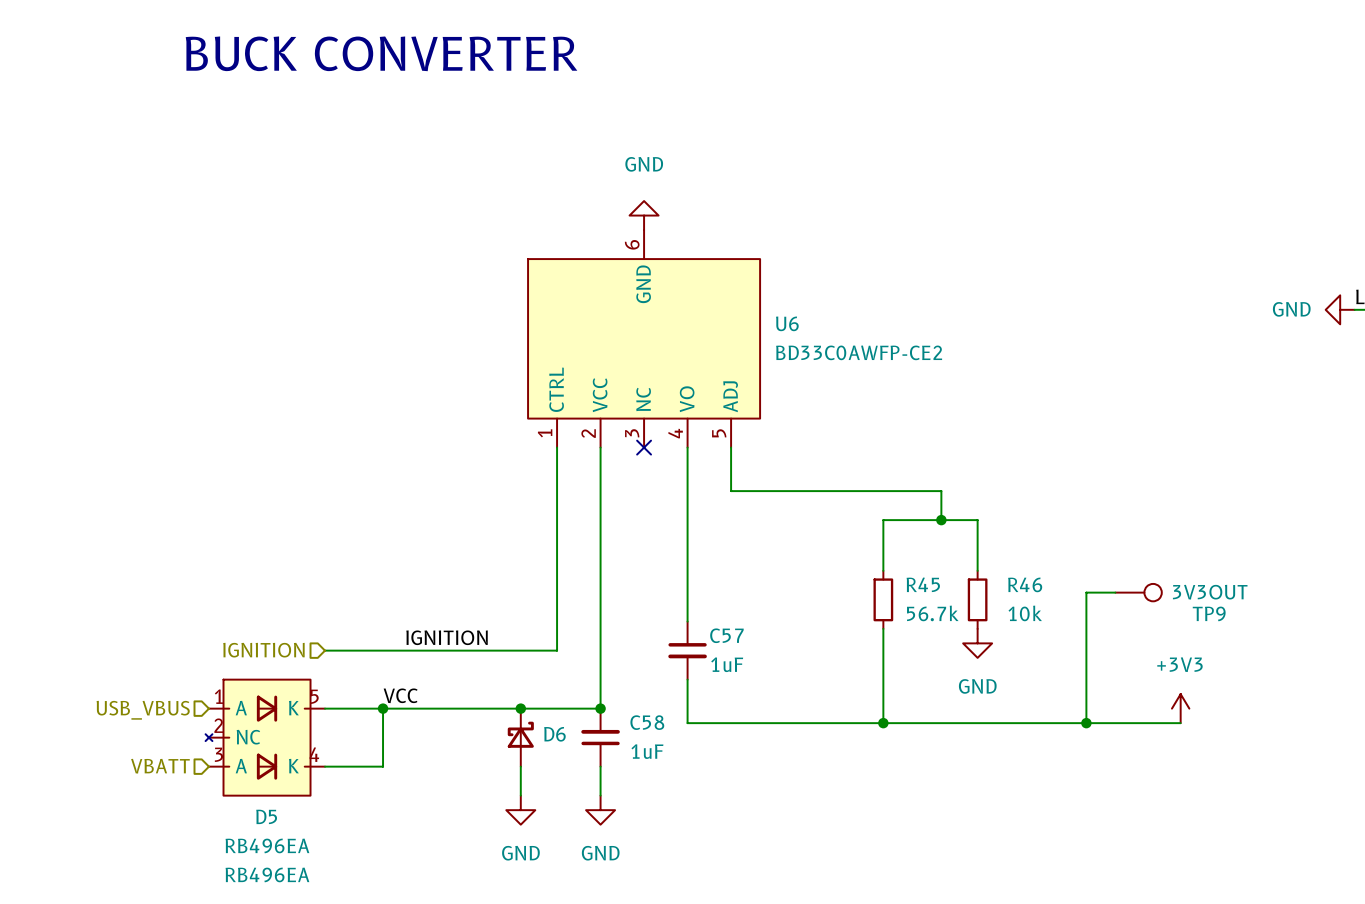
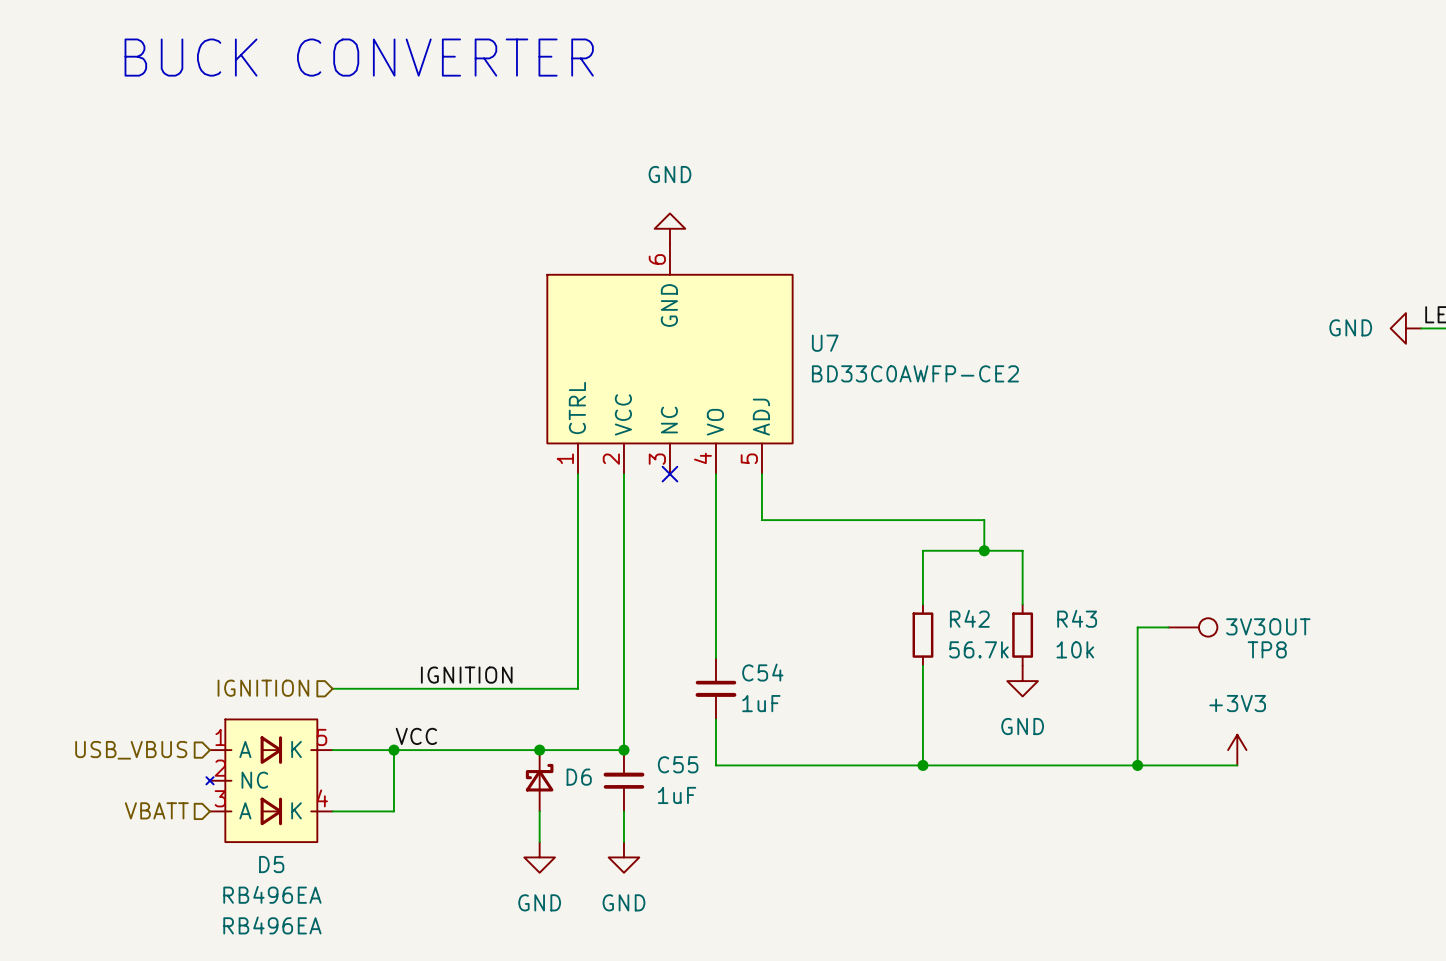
U6 name: U6 (787, 323) -> U7 (825, 343)
R45 name: R45 (923, 584) -> R42 (969, 618)
R46 name: R46 (1025, 584) -> R43 (1077, 618)
TP9 name: TP9 (1209, 613) -> TP8 (1267, 649)
C57 name: C57 (726, 635) -> C54 (762, 672)
C58 name: C58 (647, 722) -> C55 (678, 764)

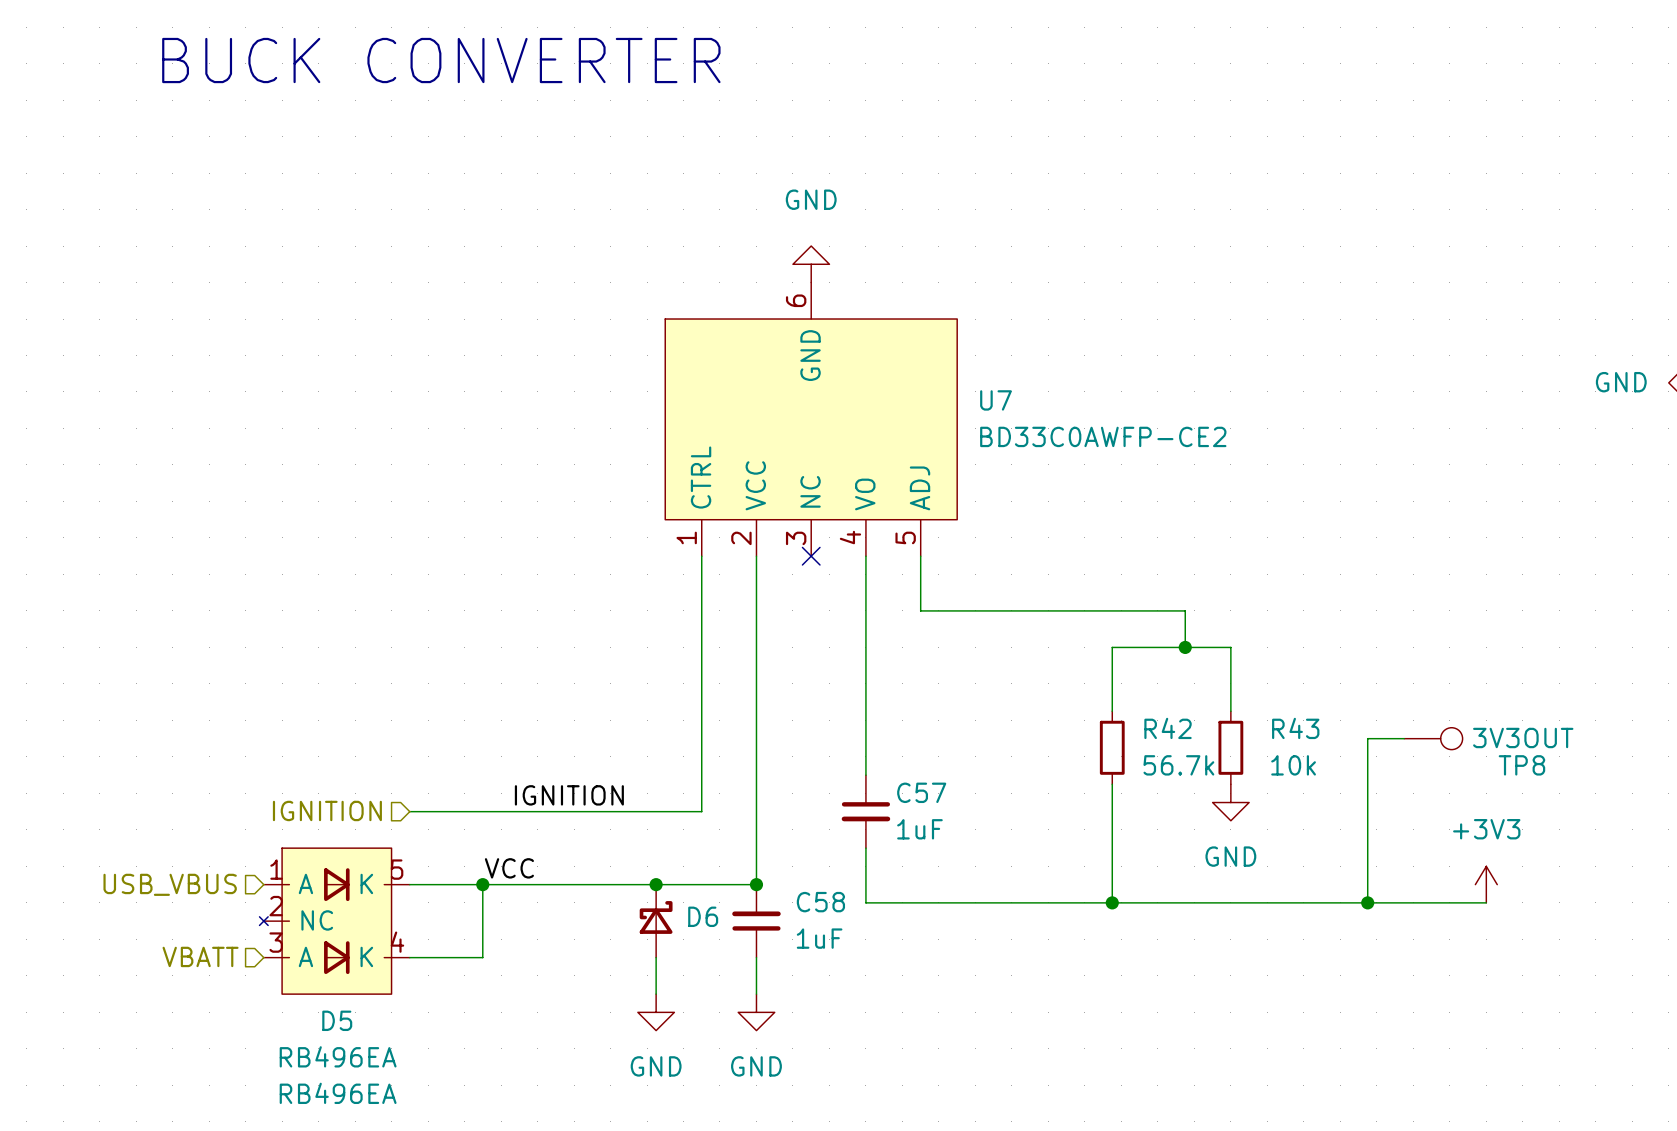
C54 name: C54 (762, 672) -> C57 (921, 792)
C55 name: C55 (678, 764) -> C58 (820, 902)

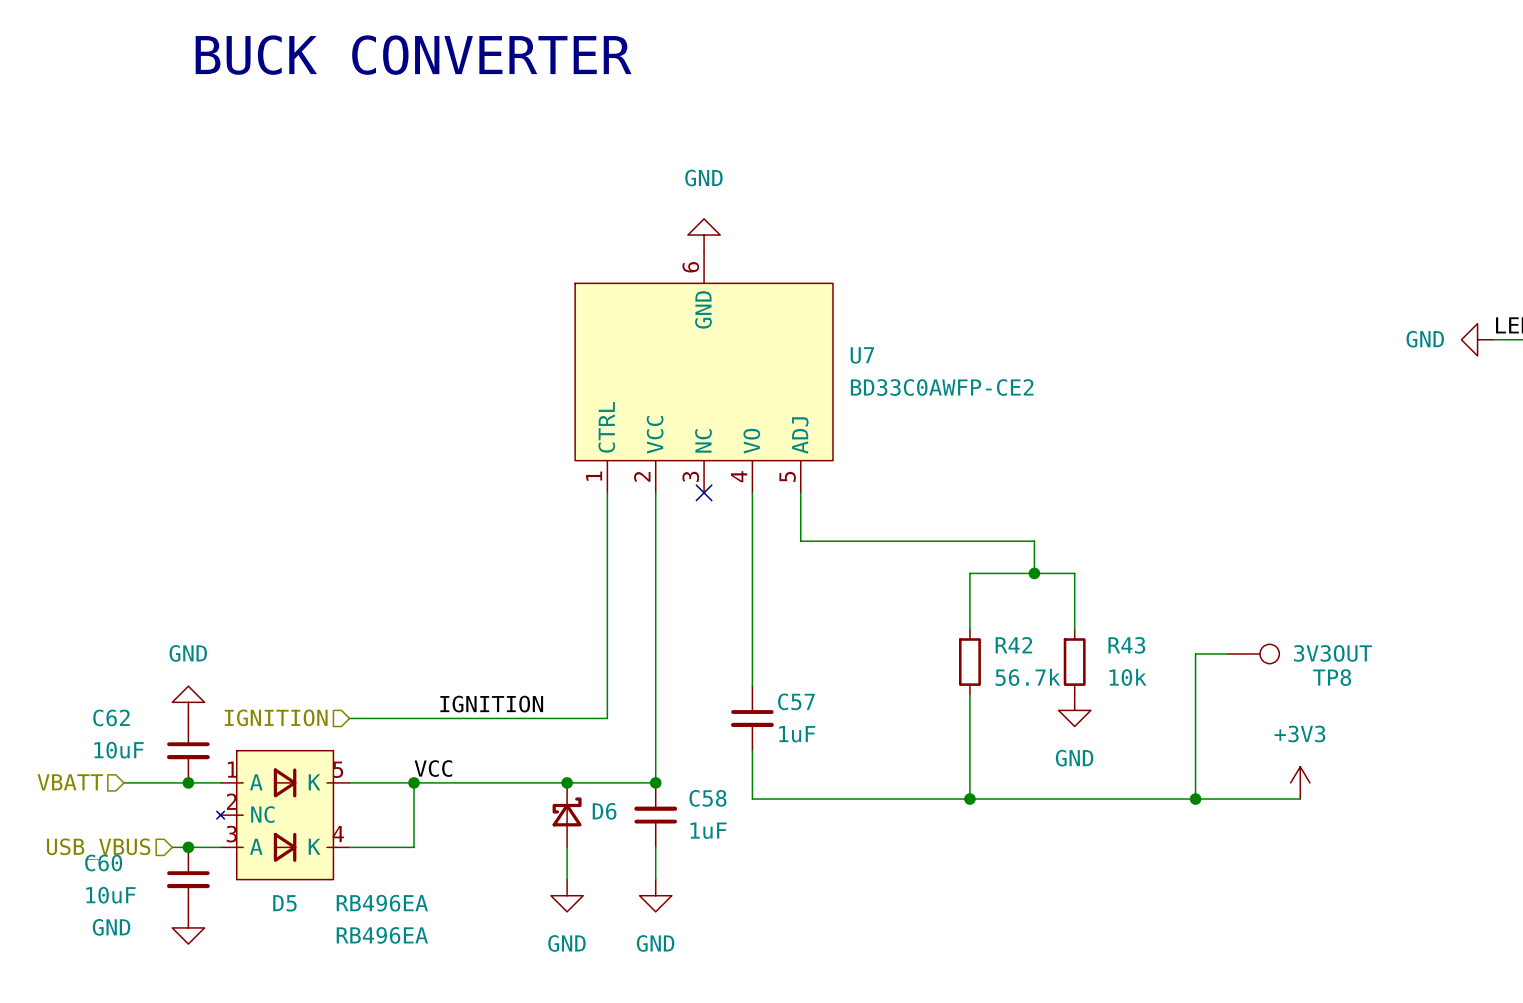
power symbol: none -> GND (188, 702)
C62: none -> 10uF (188, 750)
wire: none -> (123, 782) (220, 782)
hierarchical label position: USB_VBUS (170, 884) -> USB_VBUS (98, 849)
junction: none -> (188, 782)
hierarchical label position: VBATT (200, 956) -> VBATT (70, 782)
wire: none -> (172, 847) (220, 847)
junction: none -> (188, 847)
C60: none -> 10uF (188, 879)
power symbol: none -> GND (188, 927)
D5 value position: RB496EA (338, 1056) -> RB496EA (382, 903)
D5 text position: RB496EA (338, 1093) -> RB496EA (382, 935)

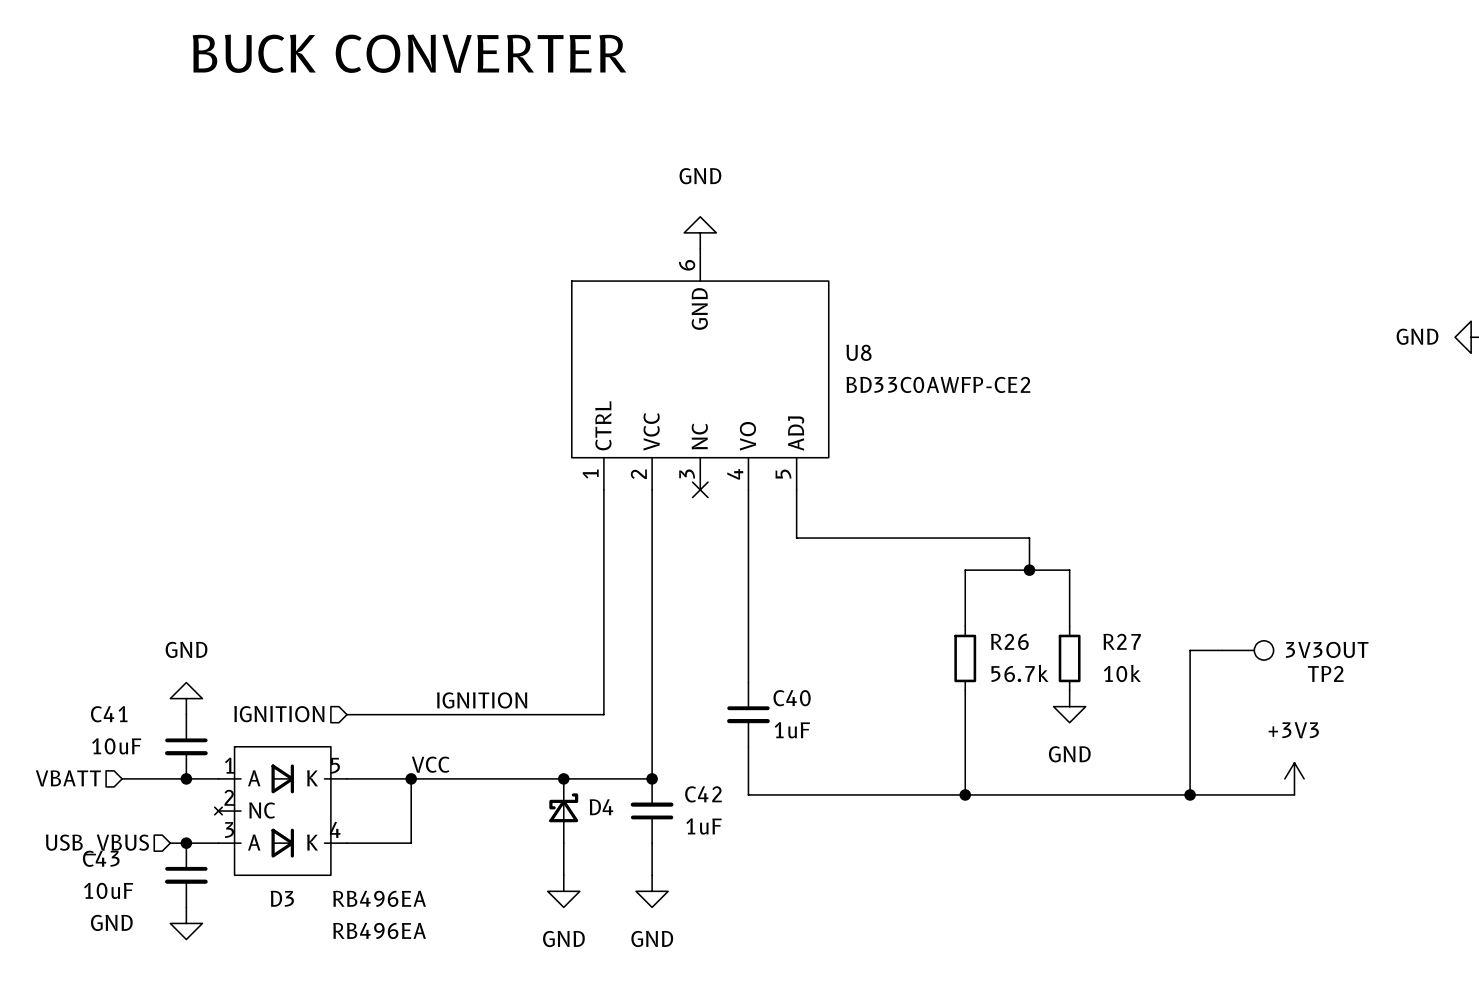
U7 name: U7 (862, 355) -> U8 (858, 352)
R42 name: R42 (1013, 645) -> R26 (1009, 641)
R43 name: R43 (1126, 645) -> R27 (1122, 641)
TP8 name: TP8 (1332, 677) -> TP2 (1325, 673)
C57 name: C57 (796, 701) -> C40 (792, 698)
C62 name: C62 (111, 717) -> C41 (109, 714)
C58 name: C58 (707, 798) -> C42 (703, 794)
D6 name: D6 (604, 811) -> D4 (601, 807)
C60 name: C60 (103, 862) -> C43 (101, 858)
D5 name: D5 (284, 903) -> D3 (282, 898)

